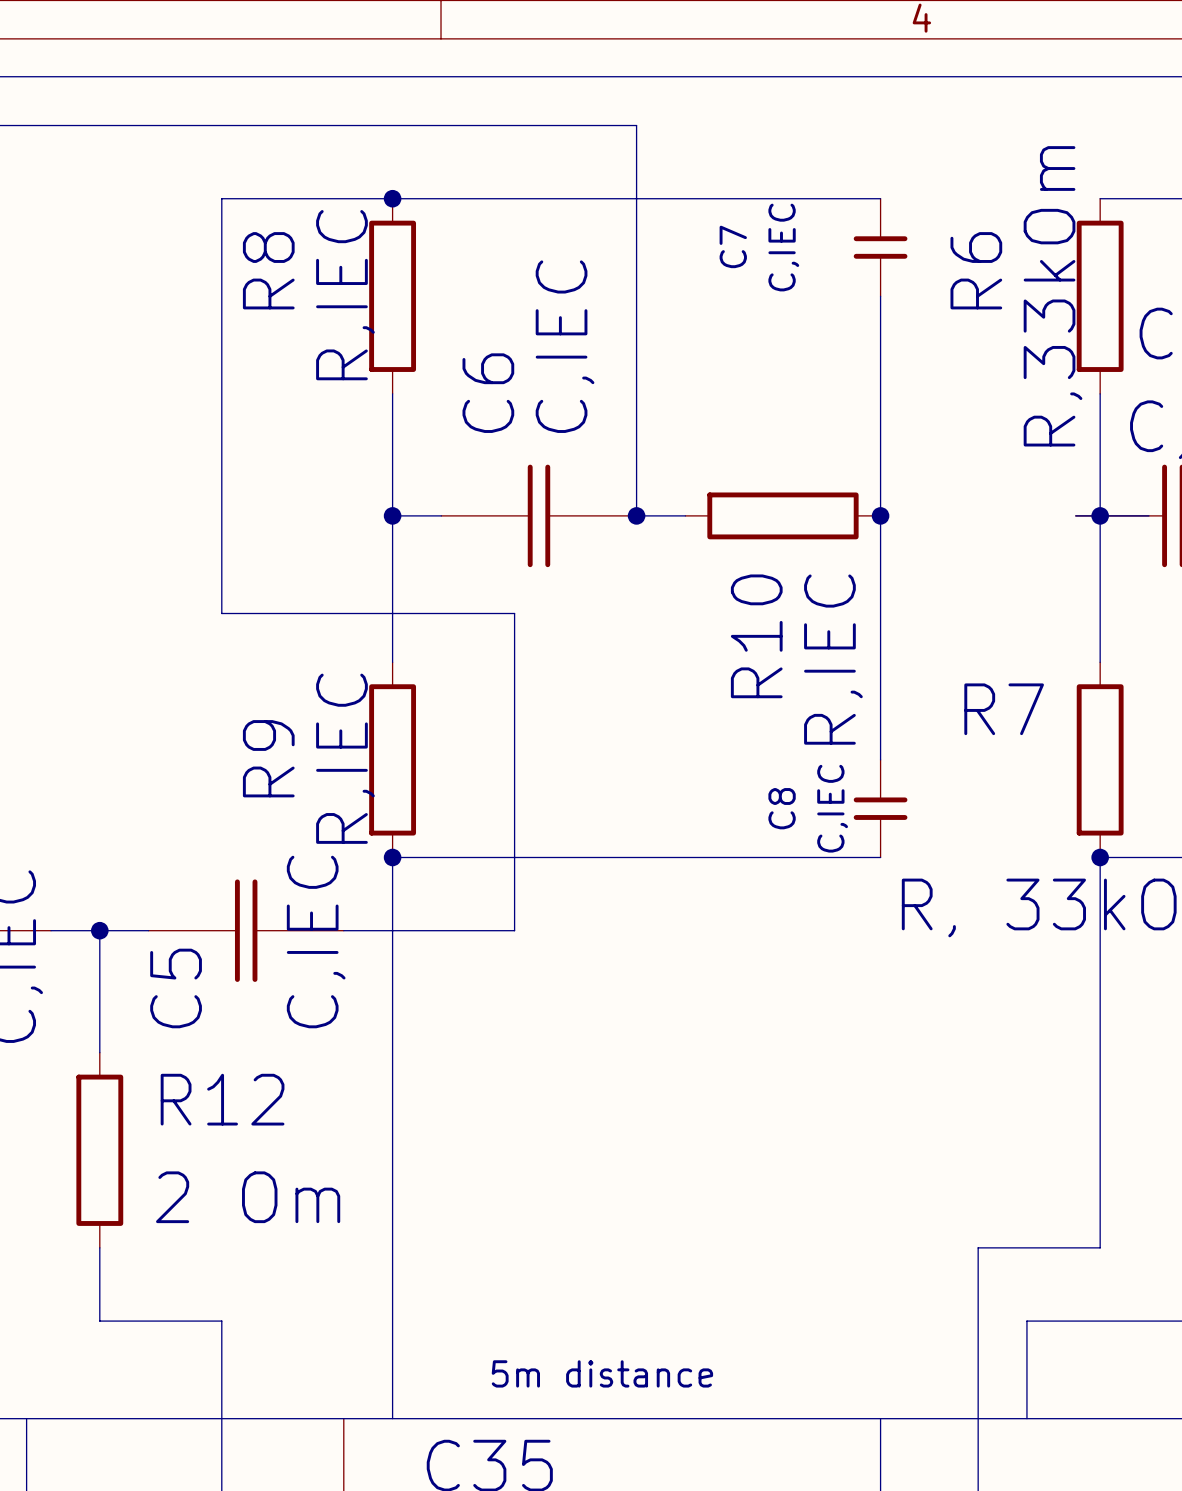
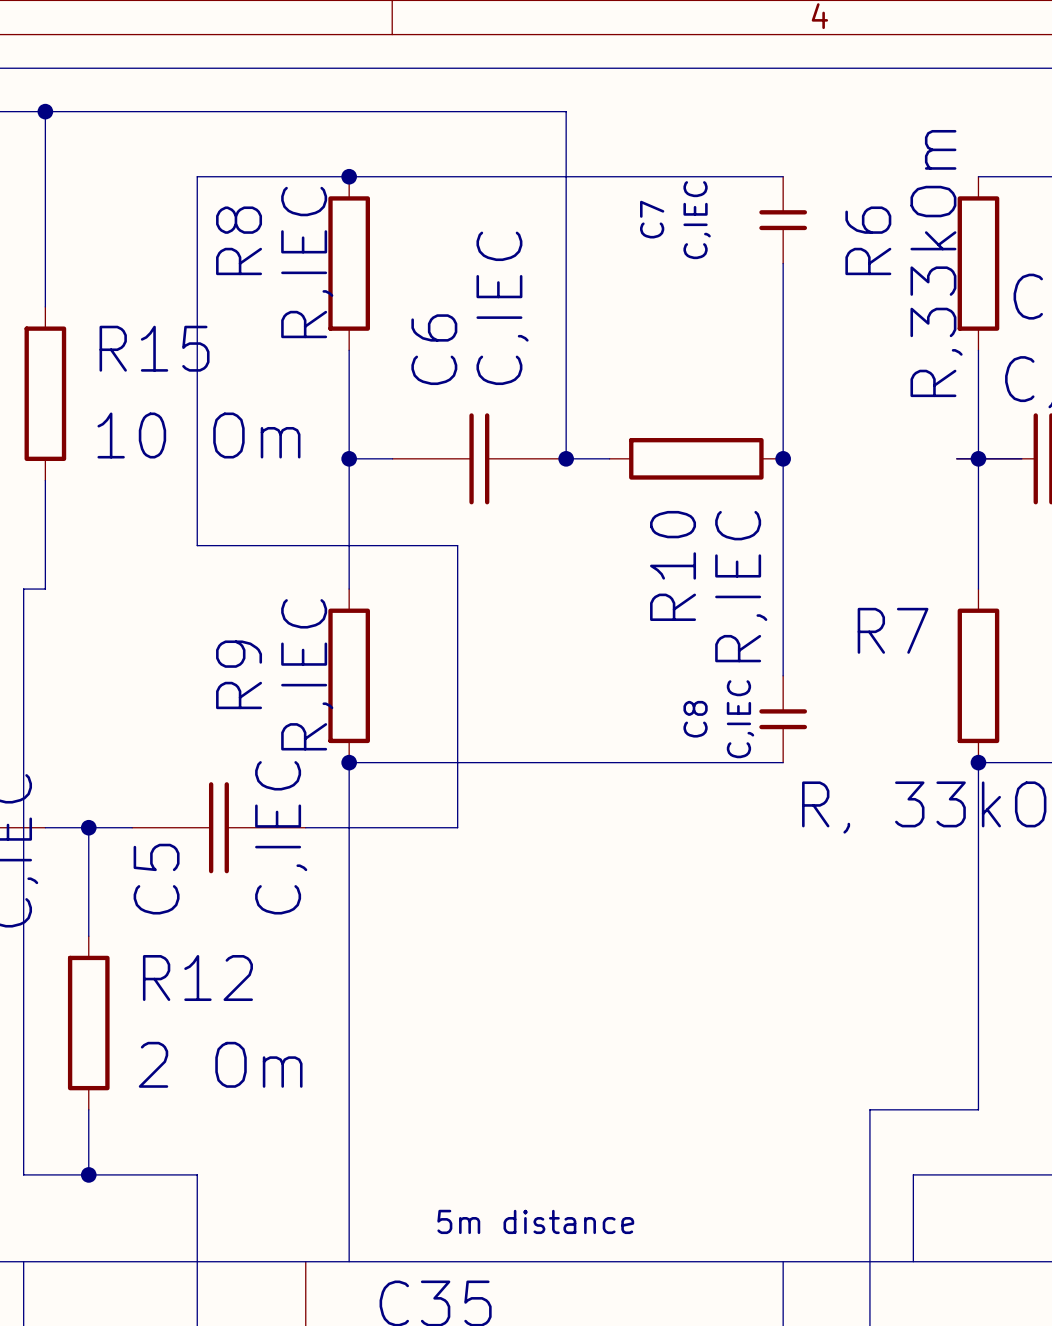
wire: none -> (45, 111) (45, 306)
junction: none -> (45, 111)
R15: none -> 10 Om (45, 393)
wire: none -> (45, 480) (45, 589) (23, 589) (23, 1174) (88, 1174)
junction: none -> (88, 1174)

